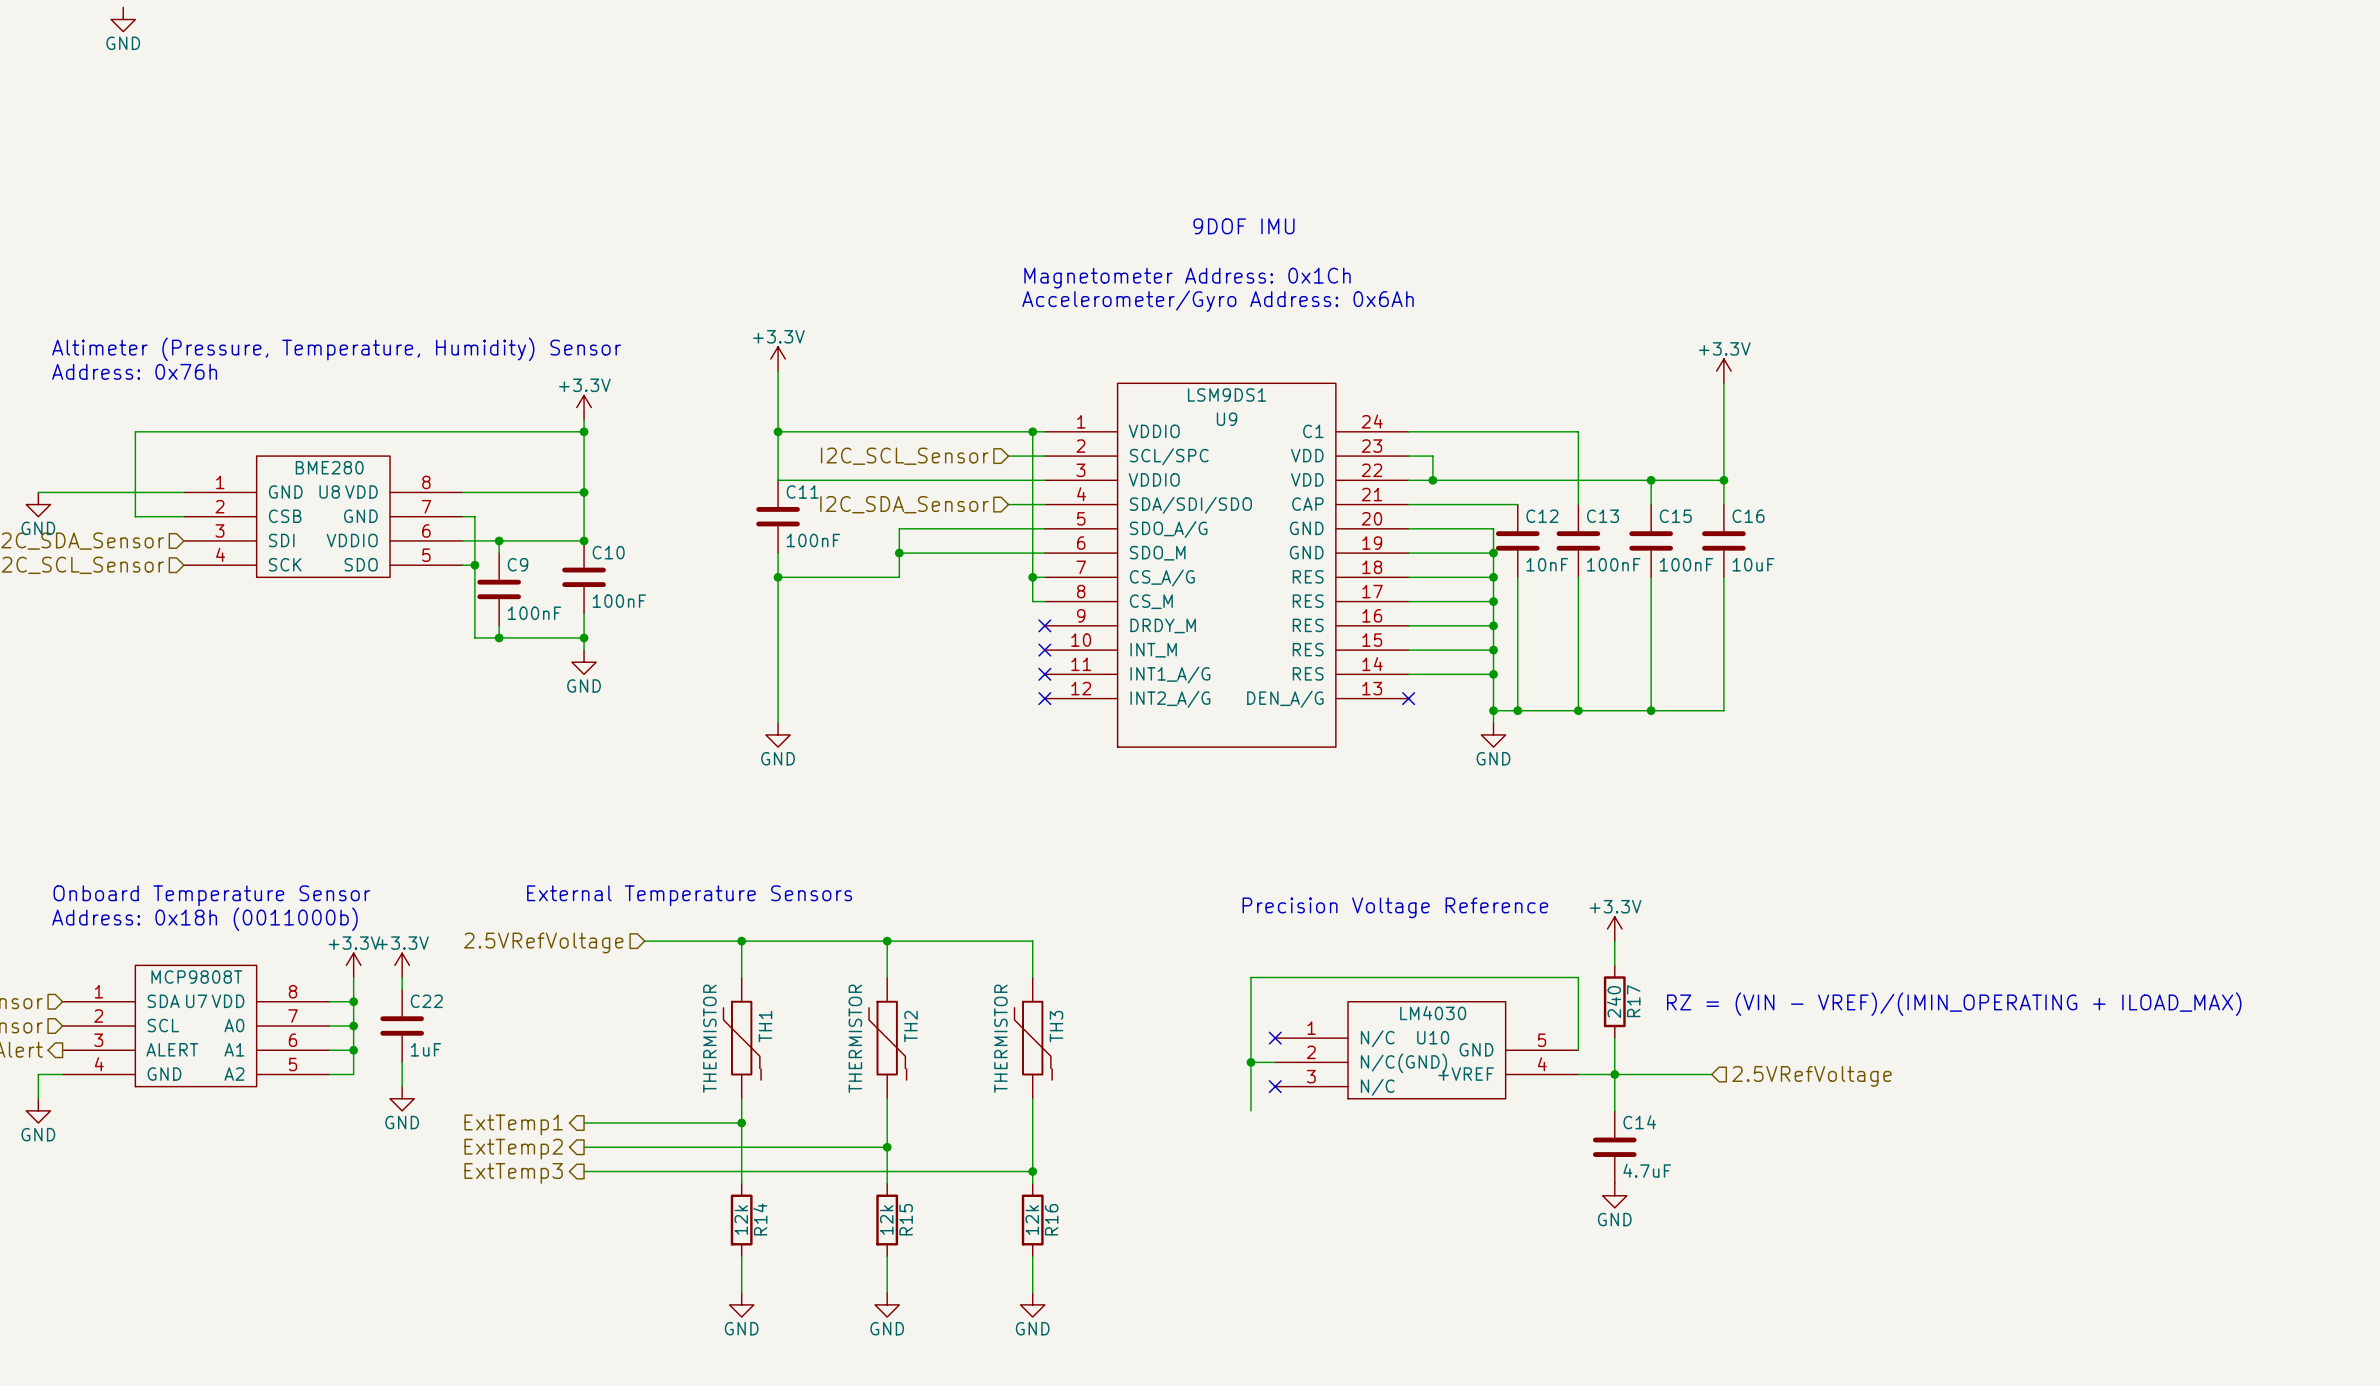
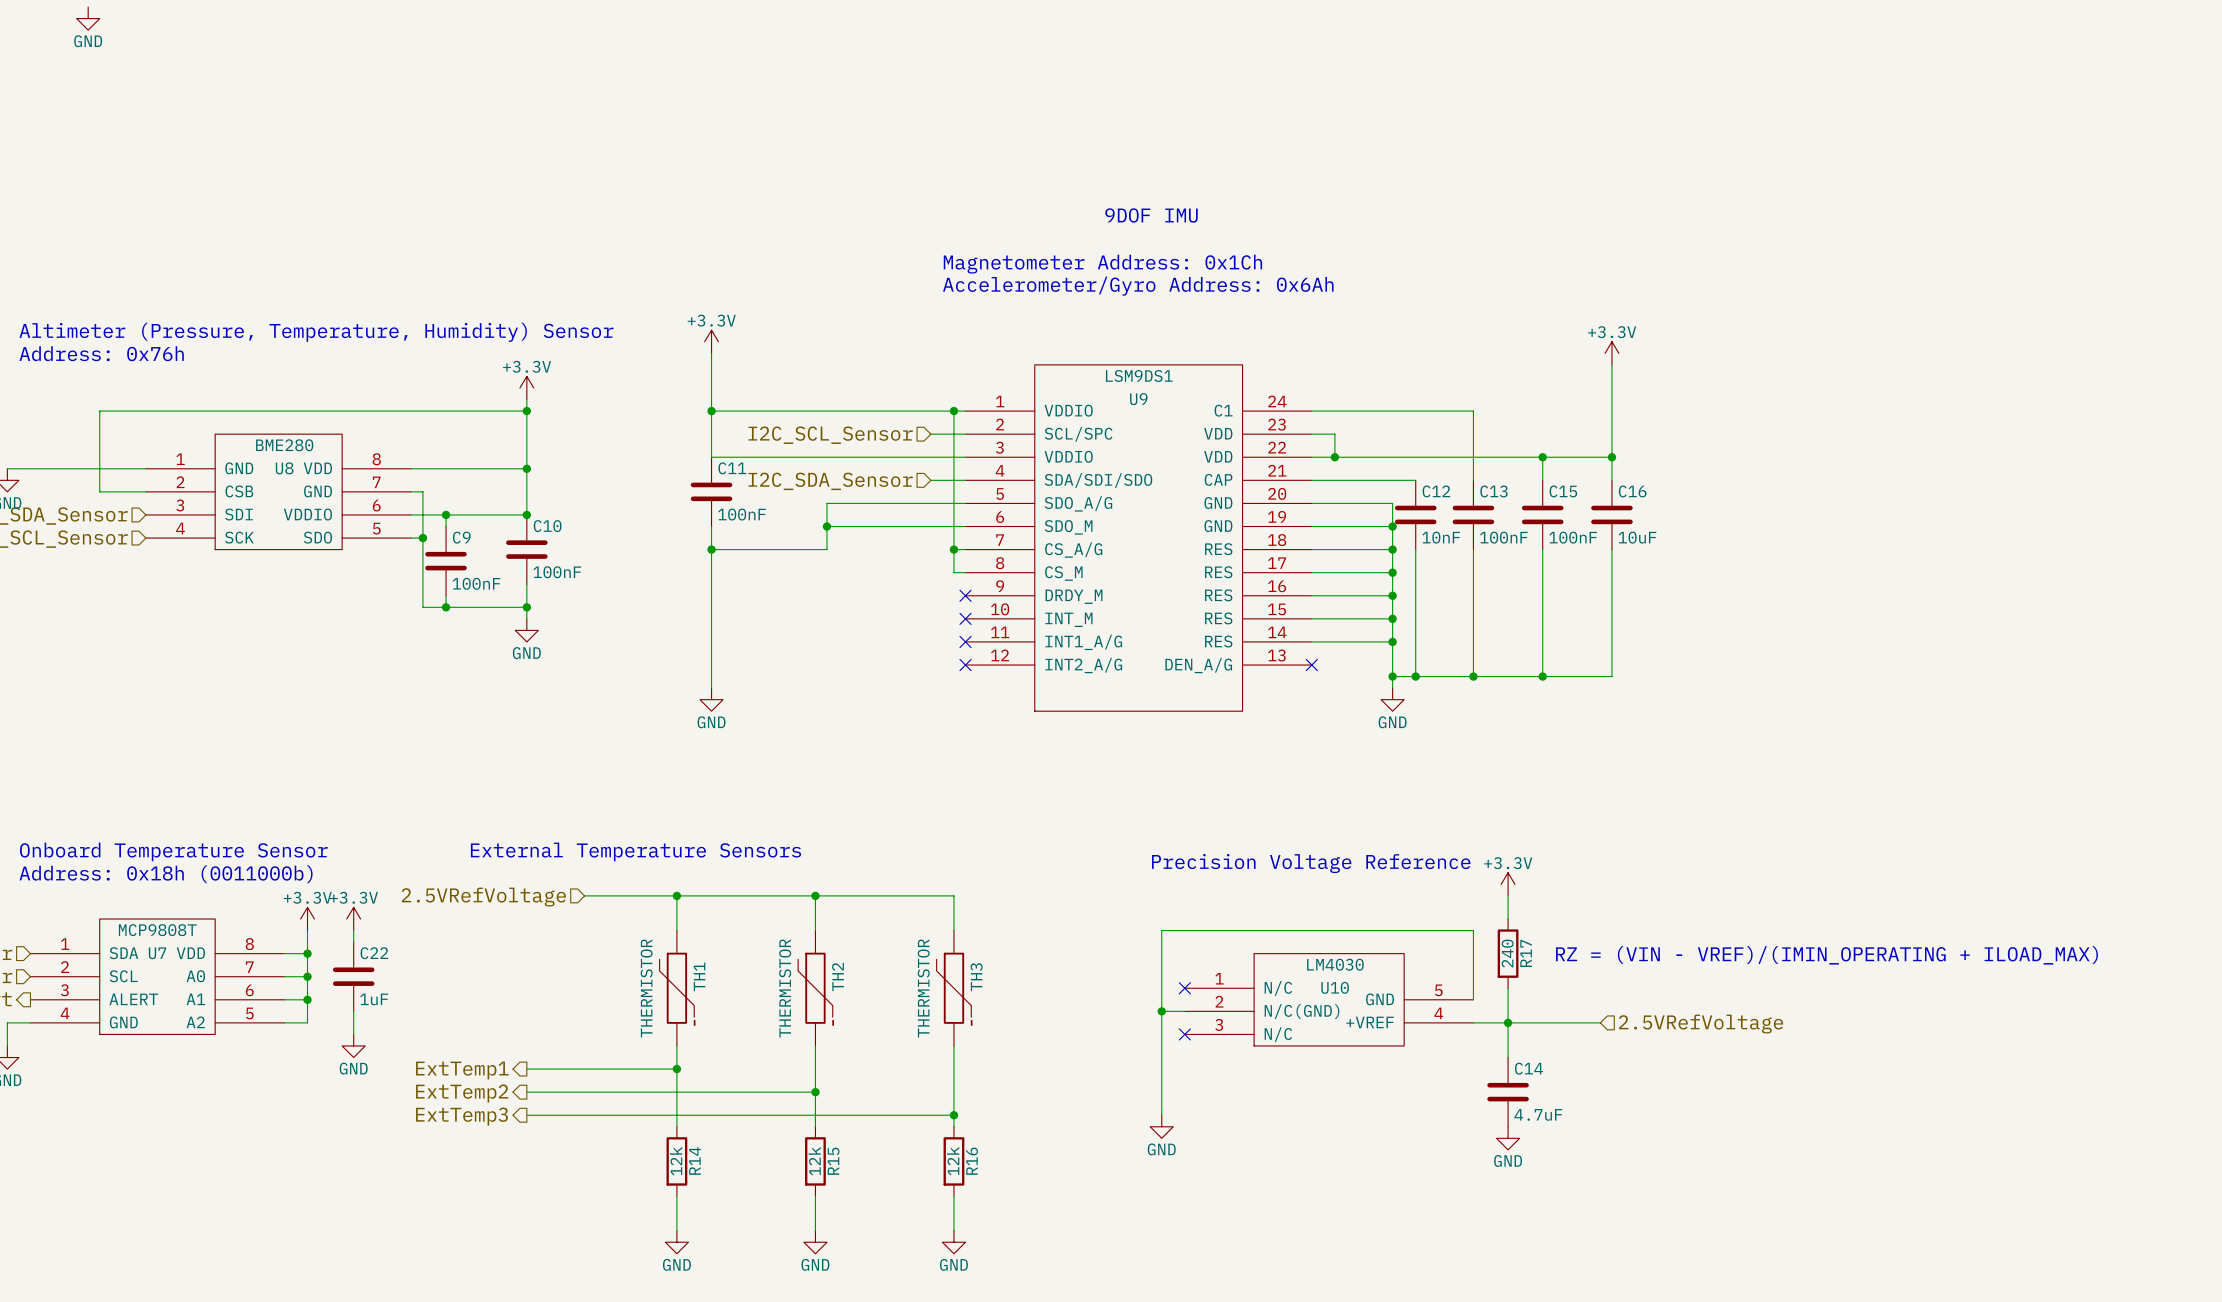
wire: none -> (1161, 1057) (1161, 1115)
power symbol: none -> GND (1161, 1126)

